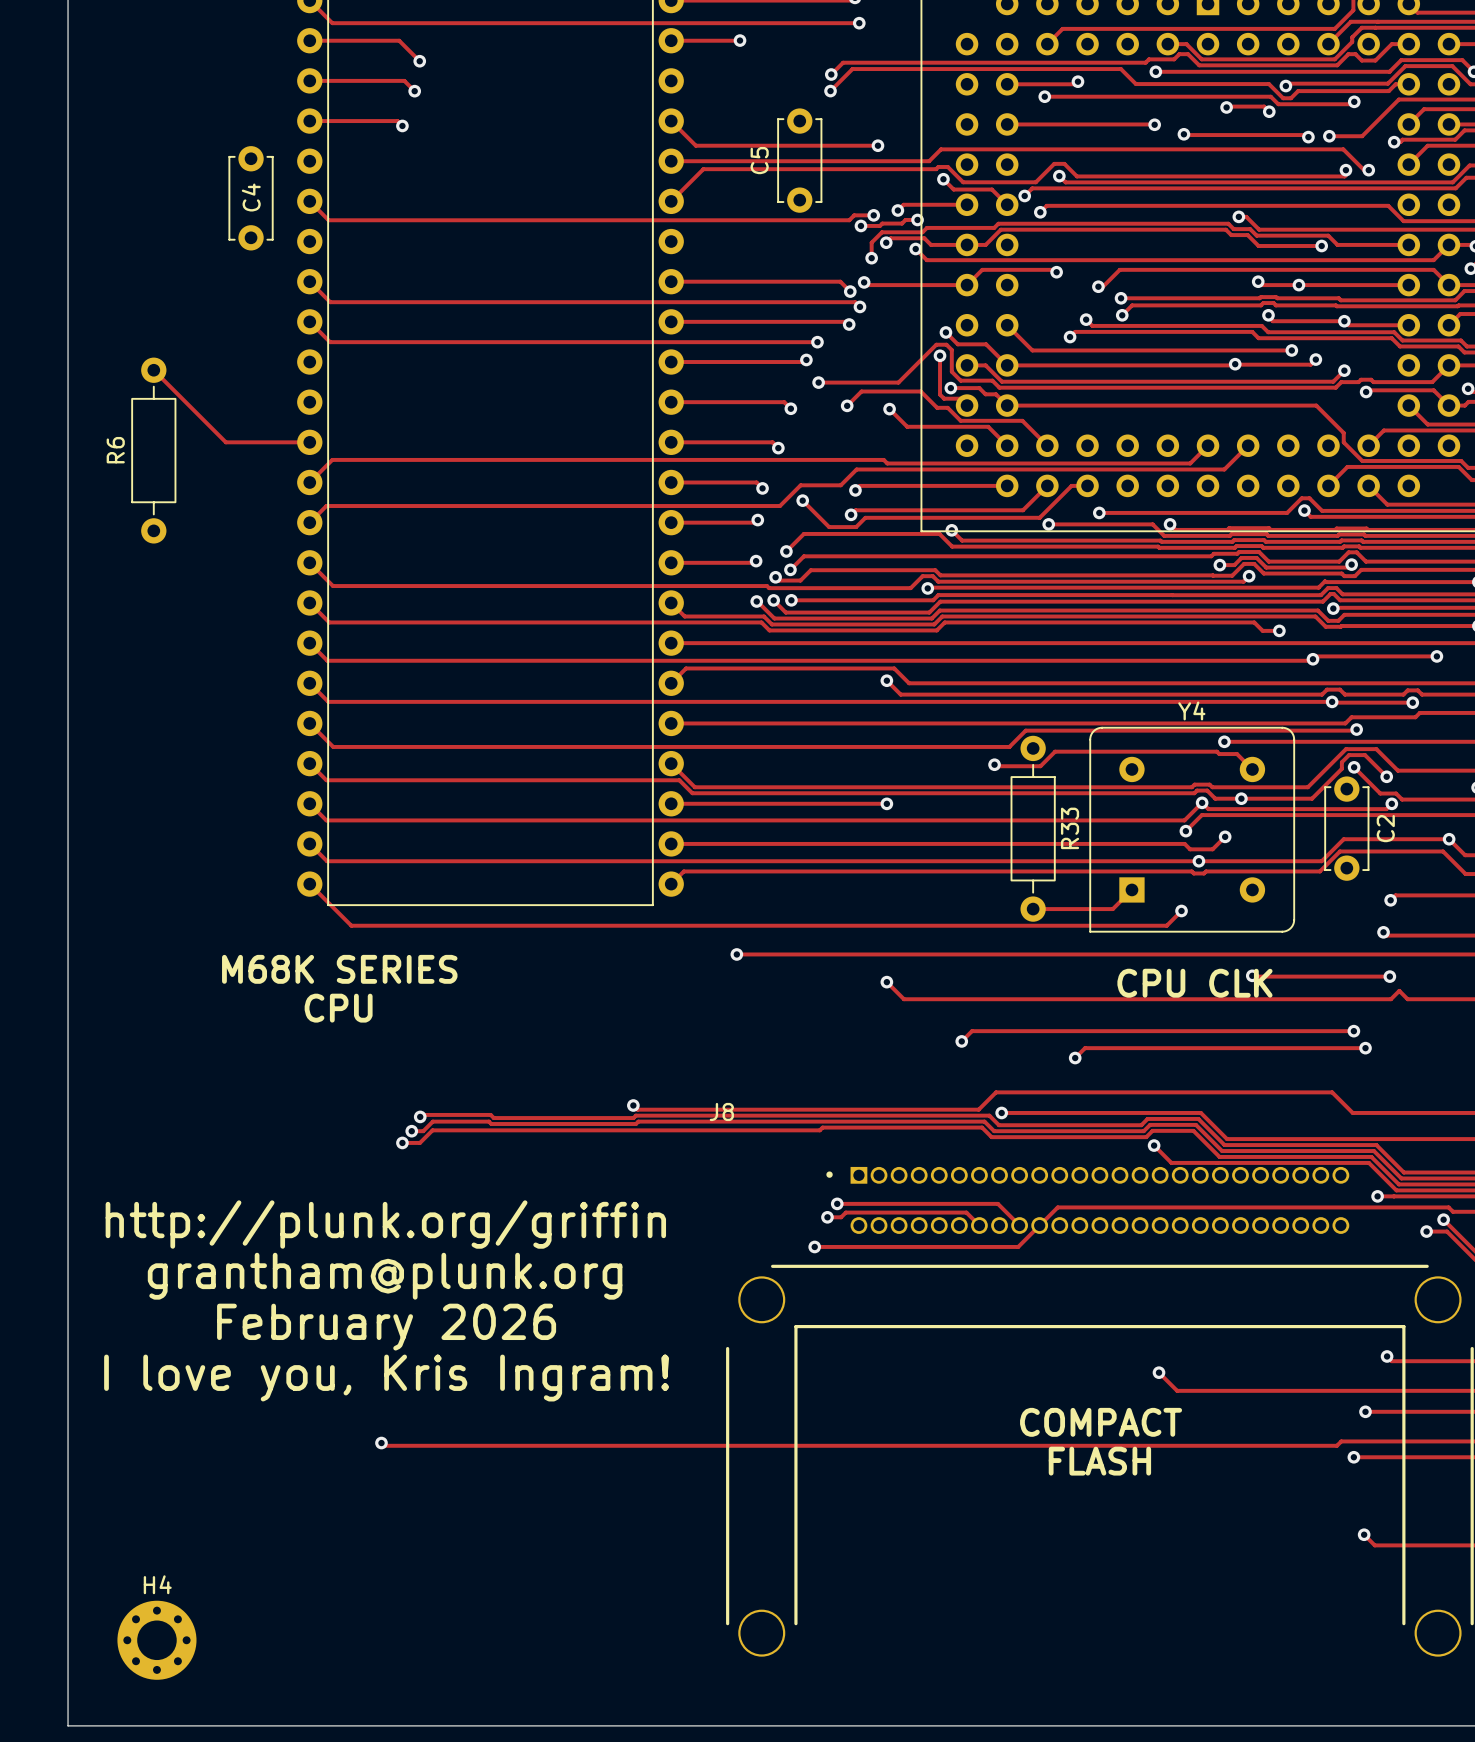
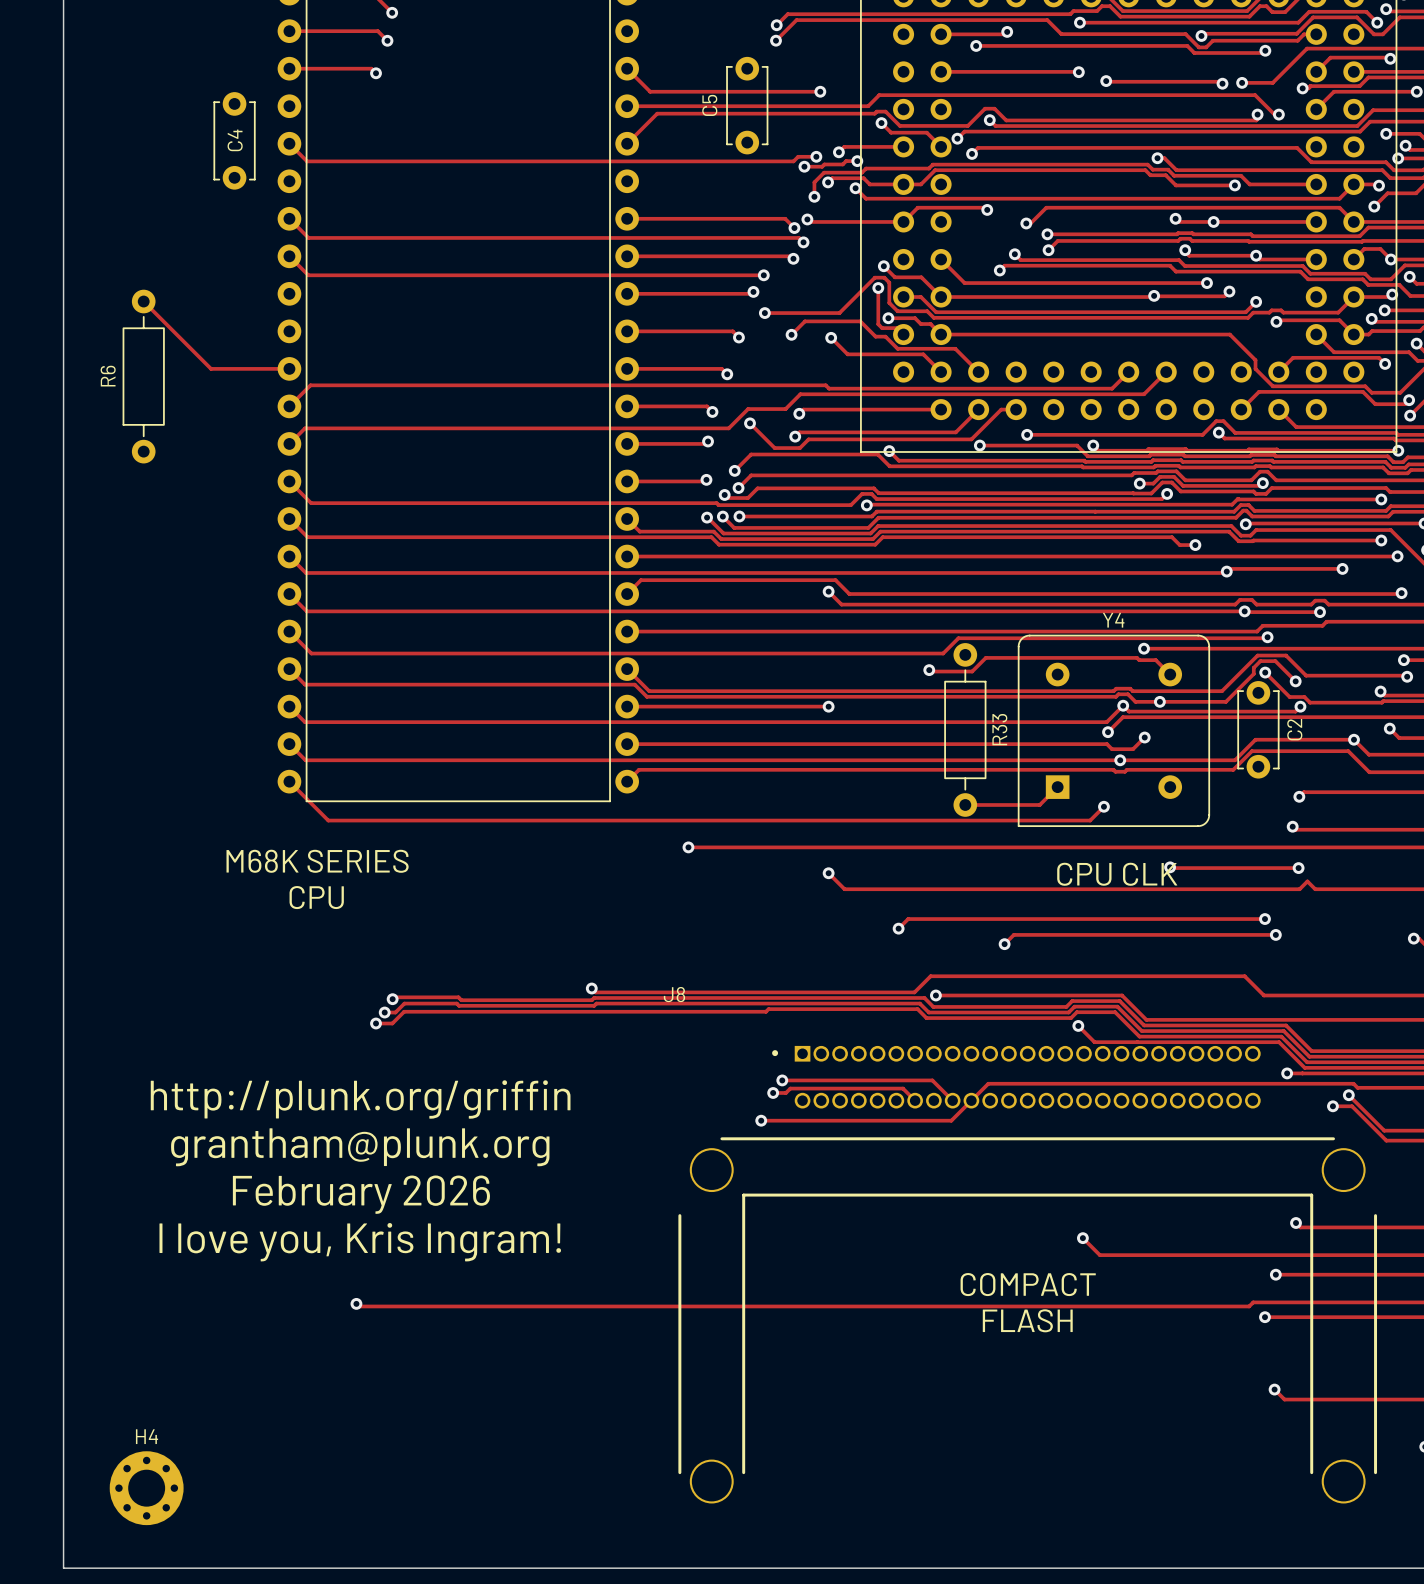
track: (1226, 107) (1264, 106) (1269, 111) -> none
via: (1226, 107) -> none
via: (1269, 111) -> none

